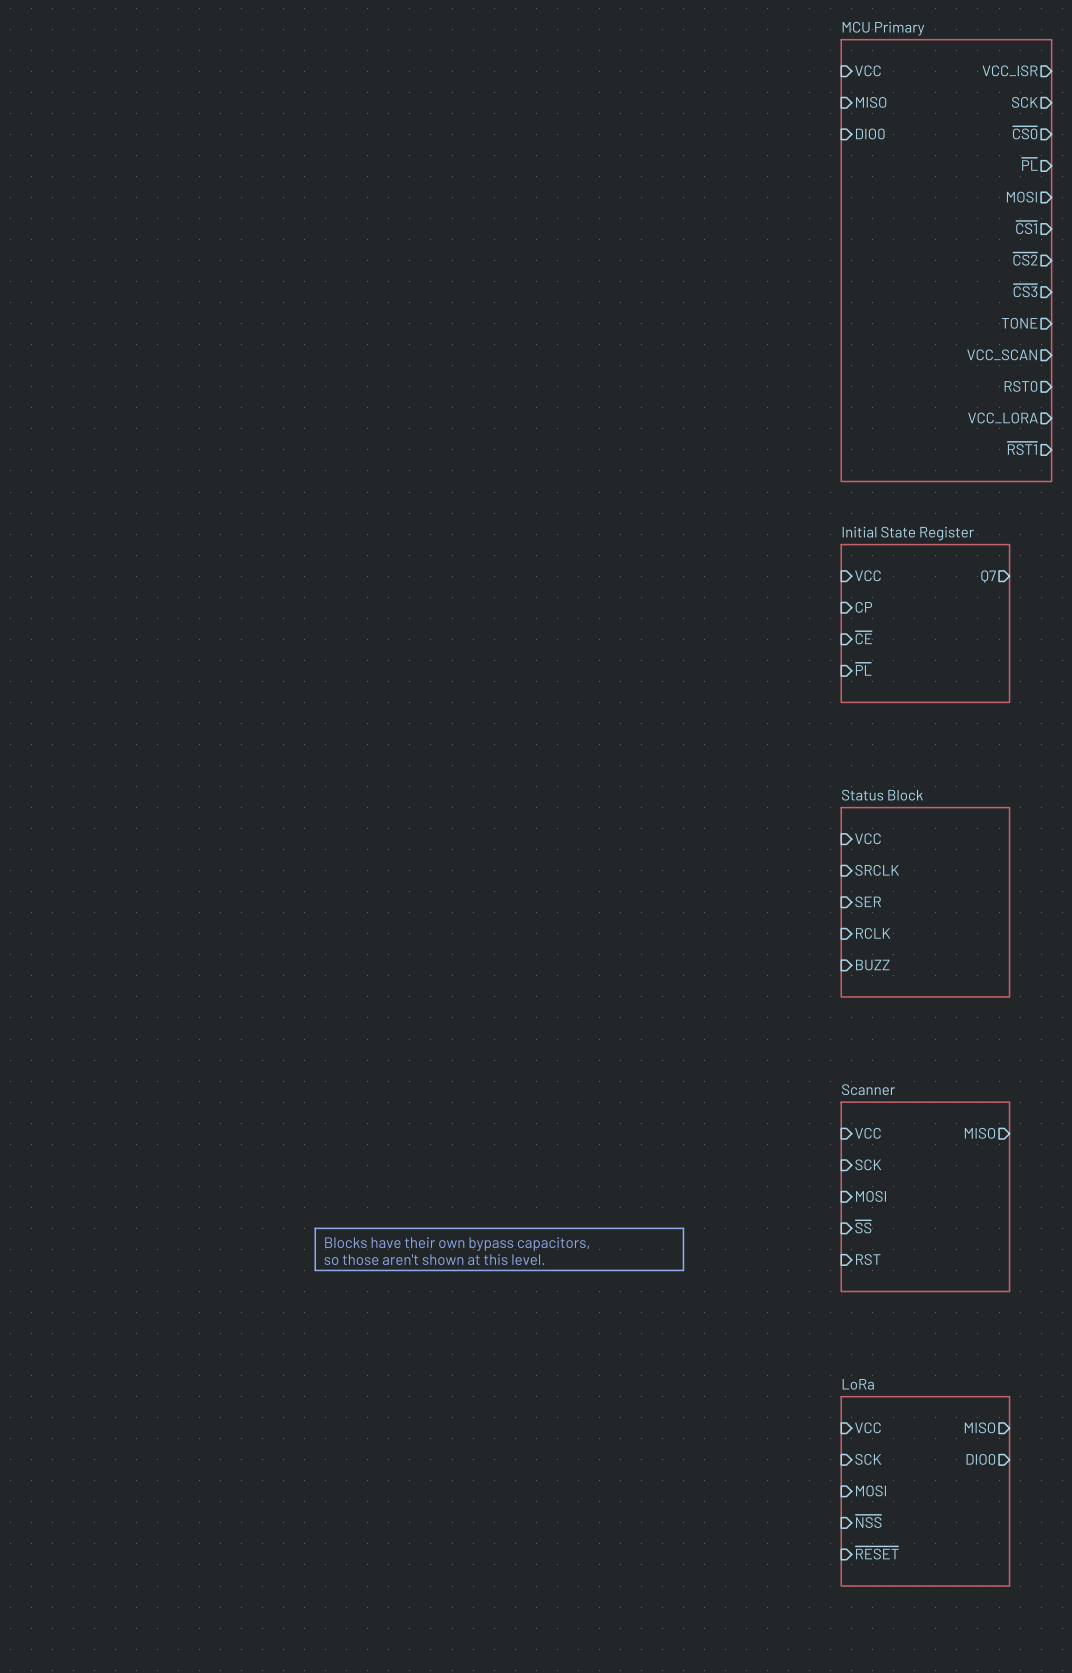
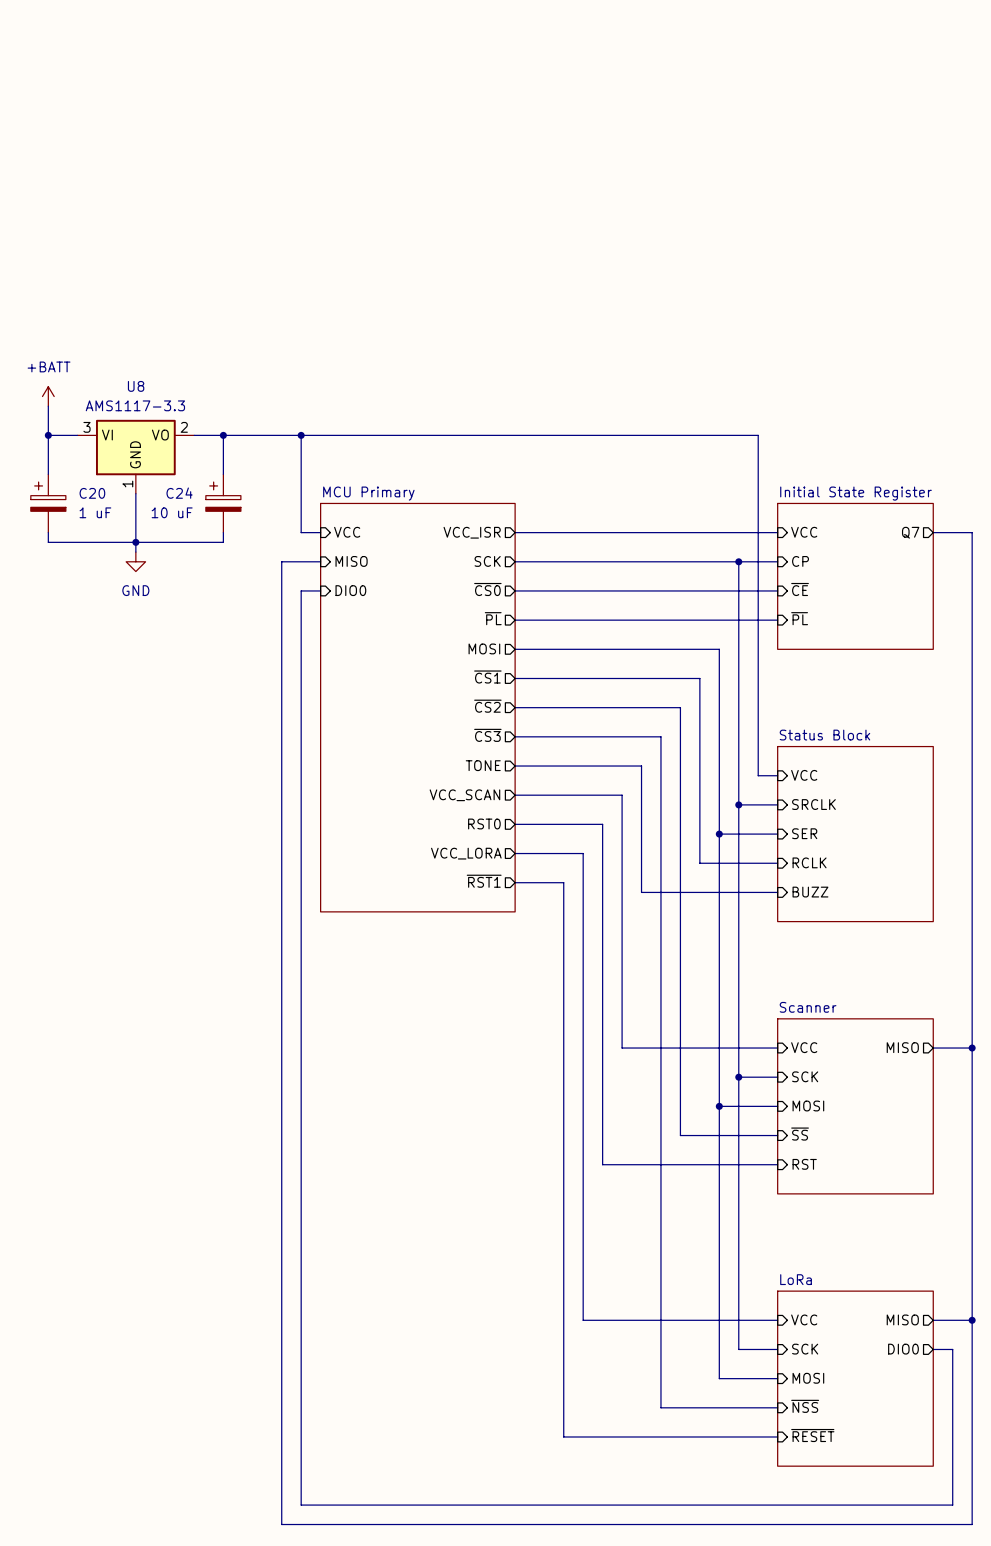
sheet pin: VCC (867, 70) -> none
sheet pin: VCC_ISR (1010, 70) -> none
sheet pin: MISO (871, 102) -> none
sheet pin: SCK (1024, 102) -> none
sheet pin: ~{CS0} (1025, 132) -> none
sheet pin: DIO0 (870, 133) -> none
sheet pin: ~{PL} (1029, 164) -> none
sheet pin: MOSI (1021, 197) -> none
sheet pin: ~{CS1} (1026, 227) -> none
sheet pin: ~{CS2} (1025, 259) -> none
sheet MCU Primary: (946, 260) -> none
sheet pin: ~{CS3} (1025, 290) -> none
sheet pin: TONE (1019, 323) -> none
sheet pin: VCC_SCAN (1002, 354) -> none
sheet pin: RST0 (1020, 386) -> none
sheet pin: VCC_LORA (1002, 417) -> none
power symbol: none -> +BATT (48, 396)
wire: none -> (48, 406) (48, 474)
sheet pin: ~{RST1} (1022, 448) -> none
wire: none -> (48, 435) (77, 435)
junction: none -> (48, 435)
wire: none -> (194, 435) (758, 435) (758, 775) (777, 775)
wire: none -> (223, 435) (223, 474)
junction: none -> (223, 435)
wire: none -> (301, 435) (301, 532) (320, 532)
junction: none -> (301, 435)
U8: none -> AMS1117-3.3 (135, 456)
wire: none -> (135, 493) (135, 552)
C20: none -> 1 uF (48, 503)
C24: none -> 10 uF (223, 503)
sheet pin: none -> VCC (347, 532)
sheet pin: none -> VCC_ISR (472, 532)
wire: none -> (48, 532) (48, 542) (223, 542) (223, 532)
wire: none -> (515, 532) (777, 532)
wire: none -> (933, 532) (972, 532) (972, 1524) (281, 1524) (281, 561) (320, 561)
junction: none -> (135, 542)
power symbol: none -> GND (135, 561)
sheet pin: none -> MISO (351, 561)
sheet pin: none -> SCK (487, 561)
wire: none -> (515, 561) (777, 561)
wire: none -> (738, 561) (738, 1349) (777, 1349)
junction: none -> (738, 561)
sheet pin: none -> ~{CS0} (487, 589)
sheet pin: none -> DIO0 (350, 590)
wire: none -> (320, 590) (301, 590) (301, 1505) (952, 1505) (952, 1349) (933, 1349)
wire: none -> (515, 590) (777, 590)
sheet pin: none -> ~{PL} (493, 618)
wire: none -> (515, 620) (777, 620)
sheet pin: none -> MOSI (484, 648)
wire: none -> (515, 649) (719, 649) (719, 1378) (777, 1378)
sheet pin: none -> ~{CS1} (487, 677)
wire: none -> (515, 678) (699, 678) (699, 863) (777, 863)
sheet pin: none -> ~{CS2} (487, 706)
sheet MCU Primary: none -> (417, 707)
wire: none -> (515, 707) (680, 707) (680, 1135) (777, 1135)
sheet pin: none -> ~{CS3} (487, 735)
wire: none -> (515, 736) (660, 736) (660, 1407) (777, 1407)
sheet pin: none -> TONE (483, 765)
wire: none -> (515, 766) (641, 766) (641, 892) (777, 892)
sheet pin: none -> VCC_SCAN (464, 795)
wire: none -> (515, 795) (622, 795) (622, 1048) (777, 1048)
wire: none -> (738, 804) (777, 804)
junction: none -> (738, 804)
sheet pin: none -> RST0 (484, 823)
wire: none -> (515, 824) (602, 824) (602, 1164) (777, 1164)
wire: none -> (719, 834) (777, 834)
junction: none -> (719, 834)
sheet pin: none -> VCC_LORA (466, 853)
wire: none -> (515, 853) (583, 853) (583, 1320) (777, 1320)
sheet pin: none -> ~{RST1} (484, 881)
wire: none -> (515, 882) (563, 882) (563, 1436) (777, 1436)
wire: none -> (933, 1048) (972, 1048)
junction: none -> (972, 1048)
wire: none -> (738, 1077) (777, 1077)
junction: none -> (738, 1077)
wire: none -> (719, 1106) (777, 1106)
junction: none -> (719, 1106)
line: (315, 1228) (683, 1228) (683, 1270) (315, 1270) (315, 1228) -> none
text: Blocks have their own bypass capacitors, (457, 1244) -> none
text: so those aren't shown at this level. (434, 1259) -> none
wire: none -> (933, 1320) (972, 1320)
junction: none -> (972, 1320)

